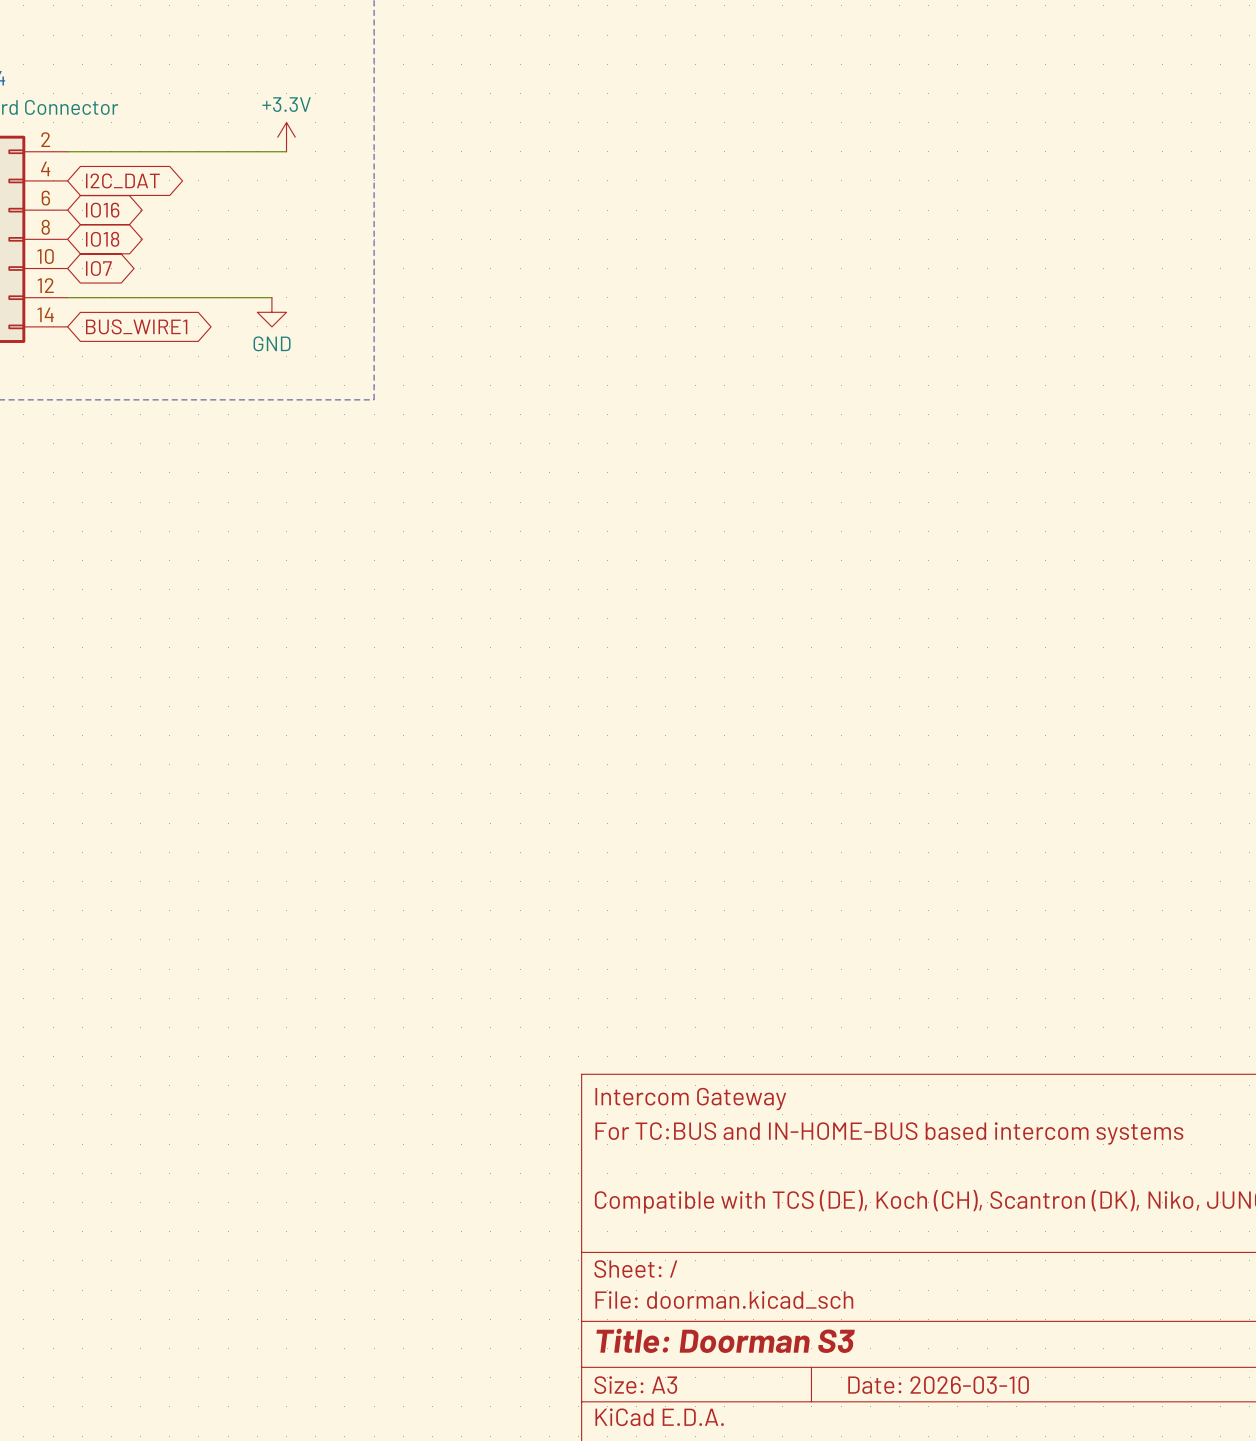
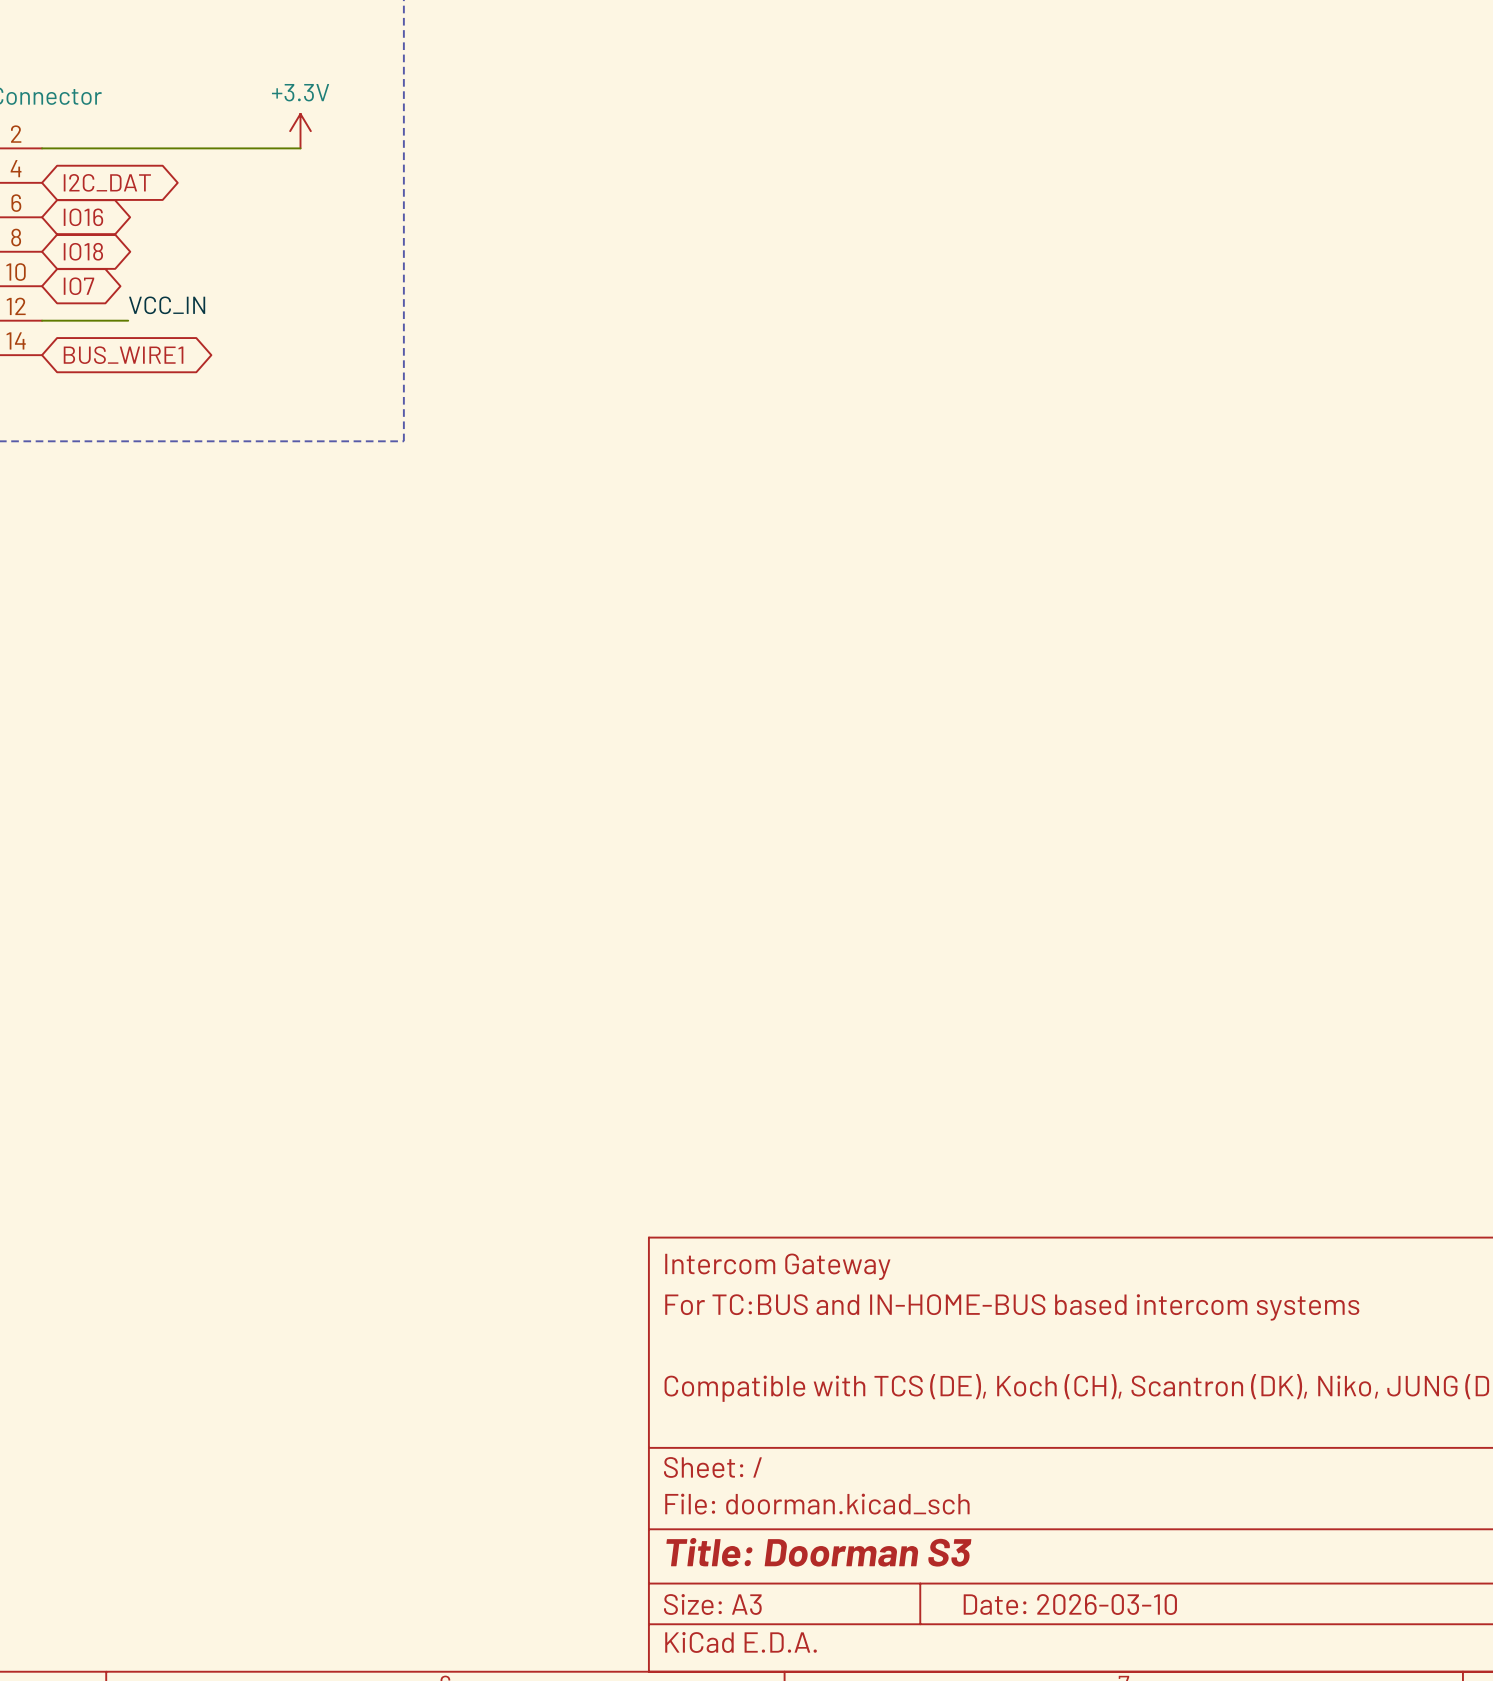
label: none -> VCC_IN (167, 305)
wire: (140, 297) (271, 297) -> none
power symbol: GND (271, 312) -> none

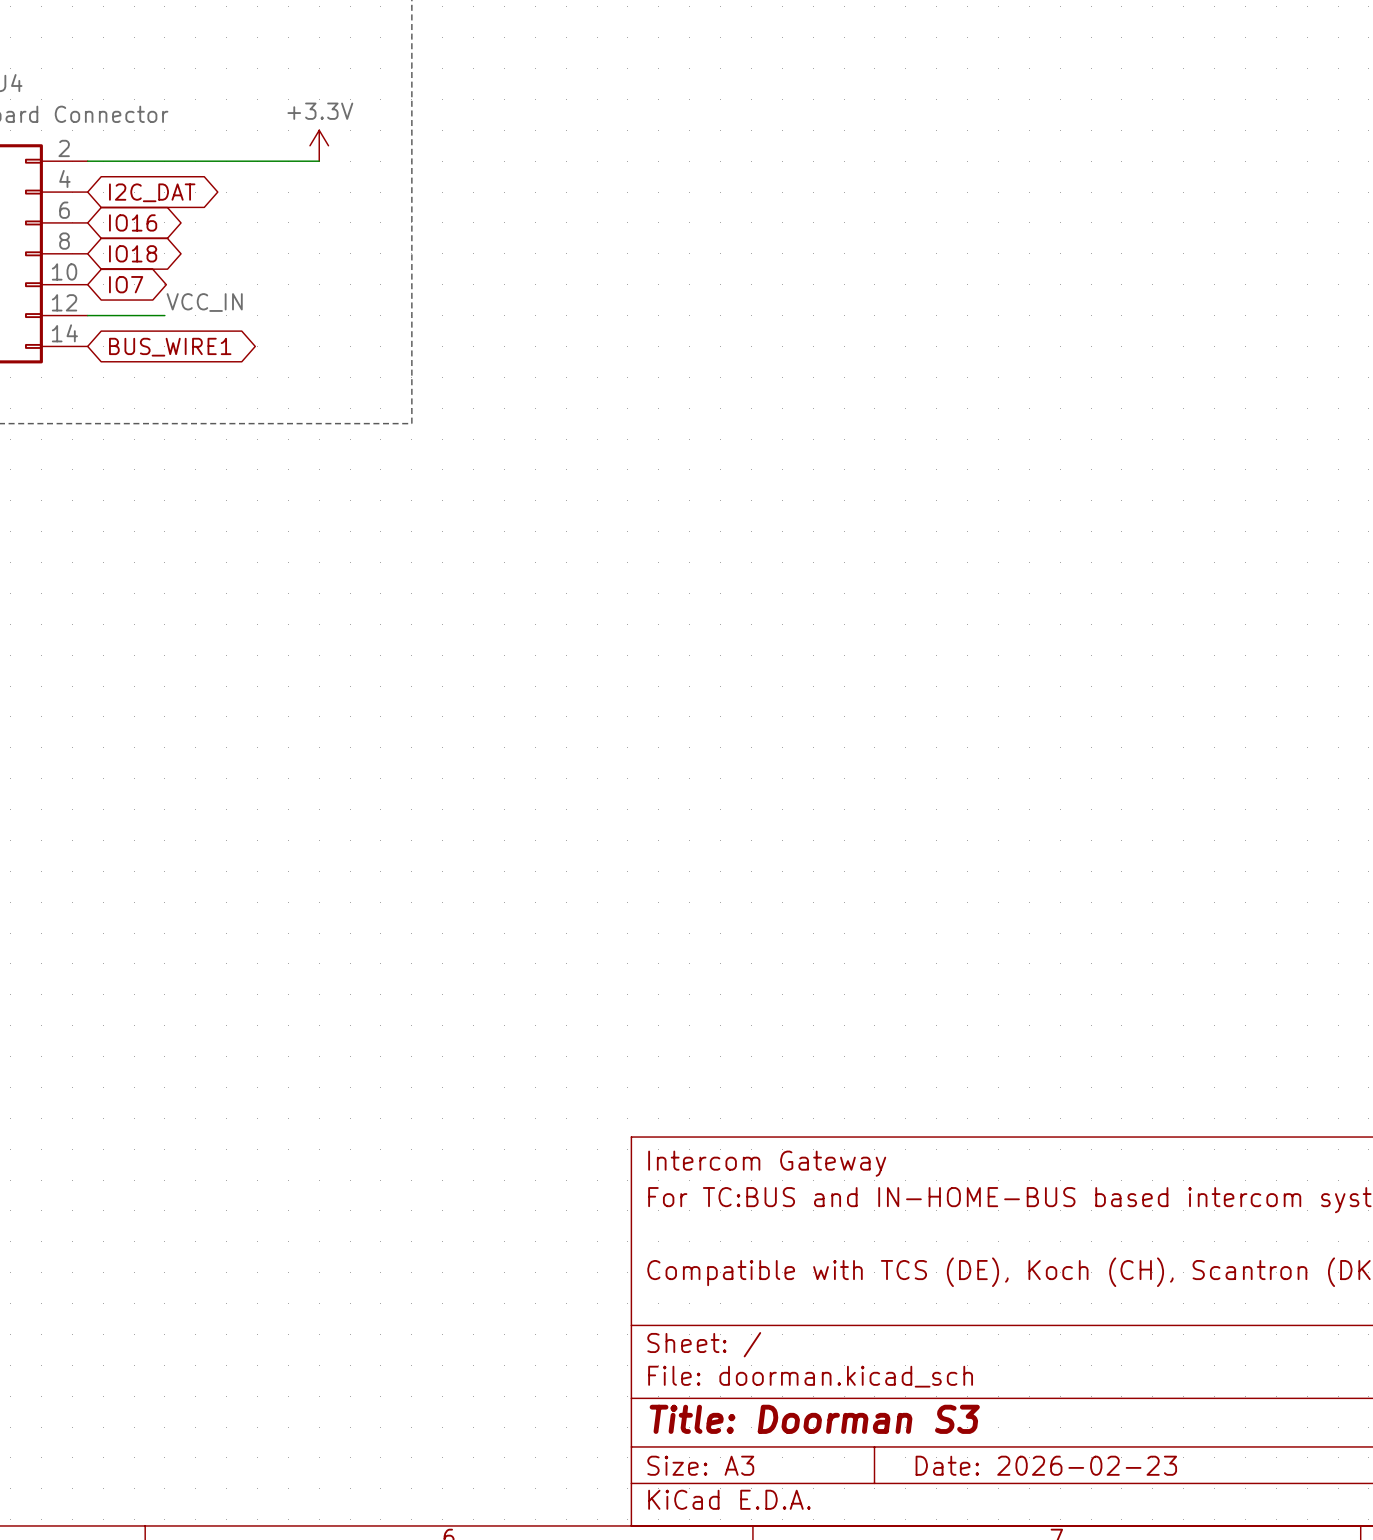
title block: Date: 2026-03-10 (1070, 1604) -> Date: 2026-02-23 (1046, 1465)

